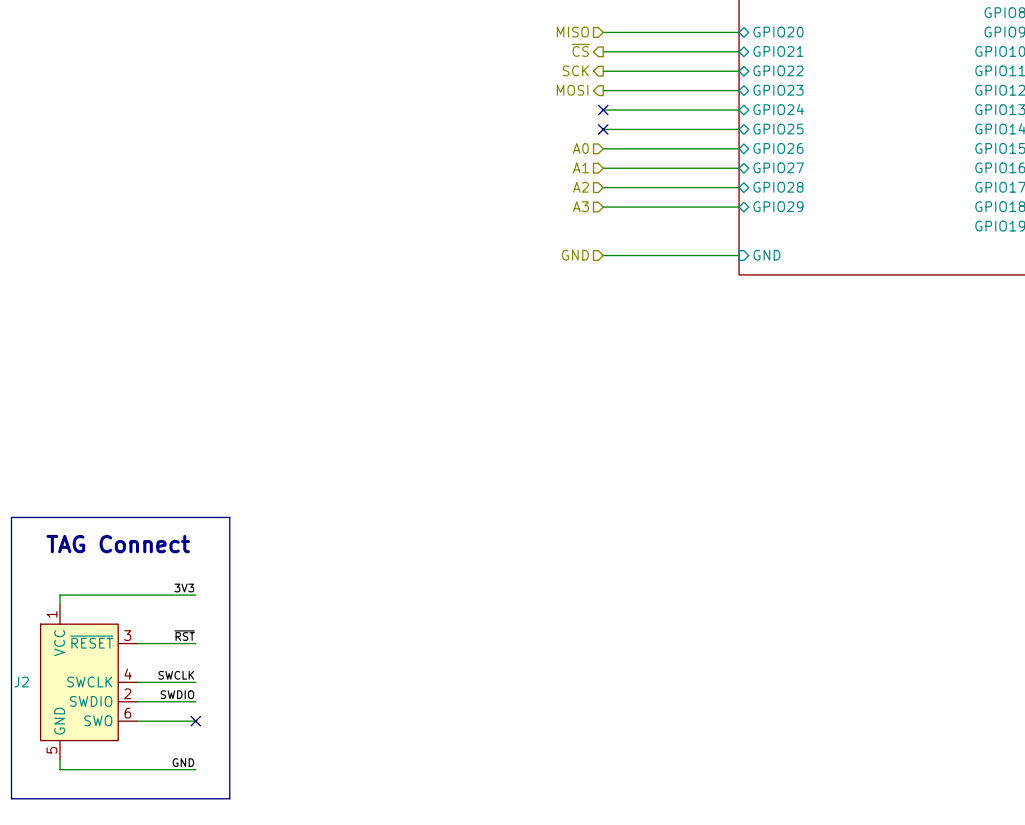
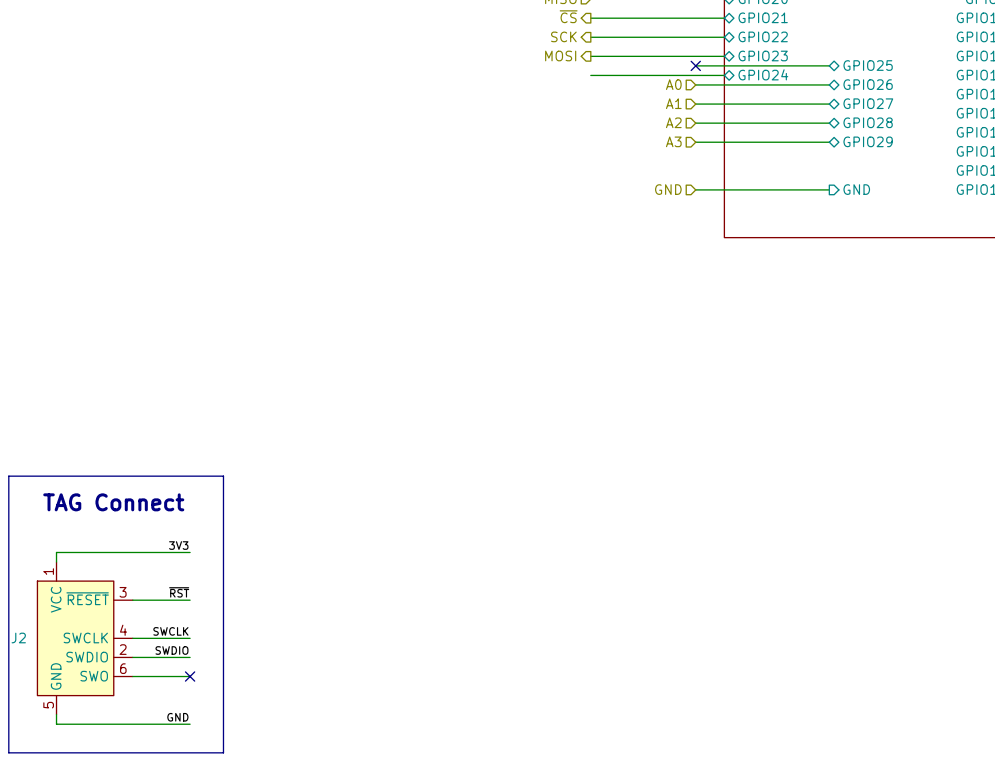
no-connect mark: none -> (695, 65)
no-connect mark: (603, 110) -> none
wire: (603, 129) (739, 129) -> (695, 65) (829, 65)
no-connect mark: (603, 129) -> none
sheet pin position: GPIO25 (778, 129) -> GPIO25 (868, 65)
hierarchical label position: A0 (580, 148) -> A0 (673, 84)
wire: (603, 148) (739, 148) -> (695, 84) (829, 84)
sheet pin position: GPIO26 (778, 148) -> GPIO26 (868, 84)
hierarchical label position: A1 (580, 167) -> A1 (673, 103)
sheet pin position: GPIO27 (778, 167) -> GPIO27 (868, 103)
wire: (603, 168) (739, 168) -> (695, 104) (829, 104)
hierarchical label position: A2 (580, 187) -> A2 (673, 122)
wire: (603, 187) (739, 187) -> (695, 123) (829, 123)
sheet pin position: GPIO28 (778, 187) -> GPIO28 (868, 122)
hierarchical label position: A3 (580, 206) -> A3 (673, 141)
sheet pin position: GPIO29 (778, 206) -> GPIO29 (868, 141)
wire: (603, 207) (739, 207) -> (695, 142) (829, 142)
hierarchical label position: GND (575, 255) -> GND (668, 189)
wire: (603, 255) (739, 255) -> (695, 189) (829, 189)
sheet pin position: GND (766, 255) -> GND (856, 189)

